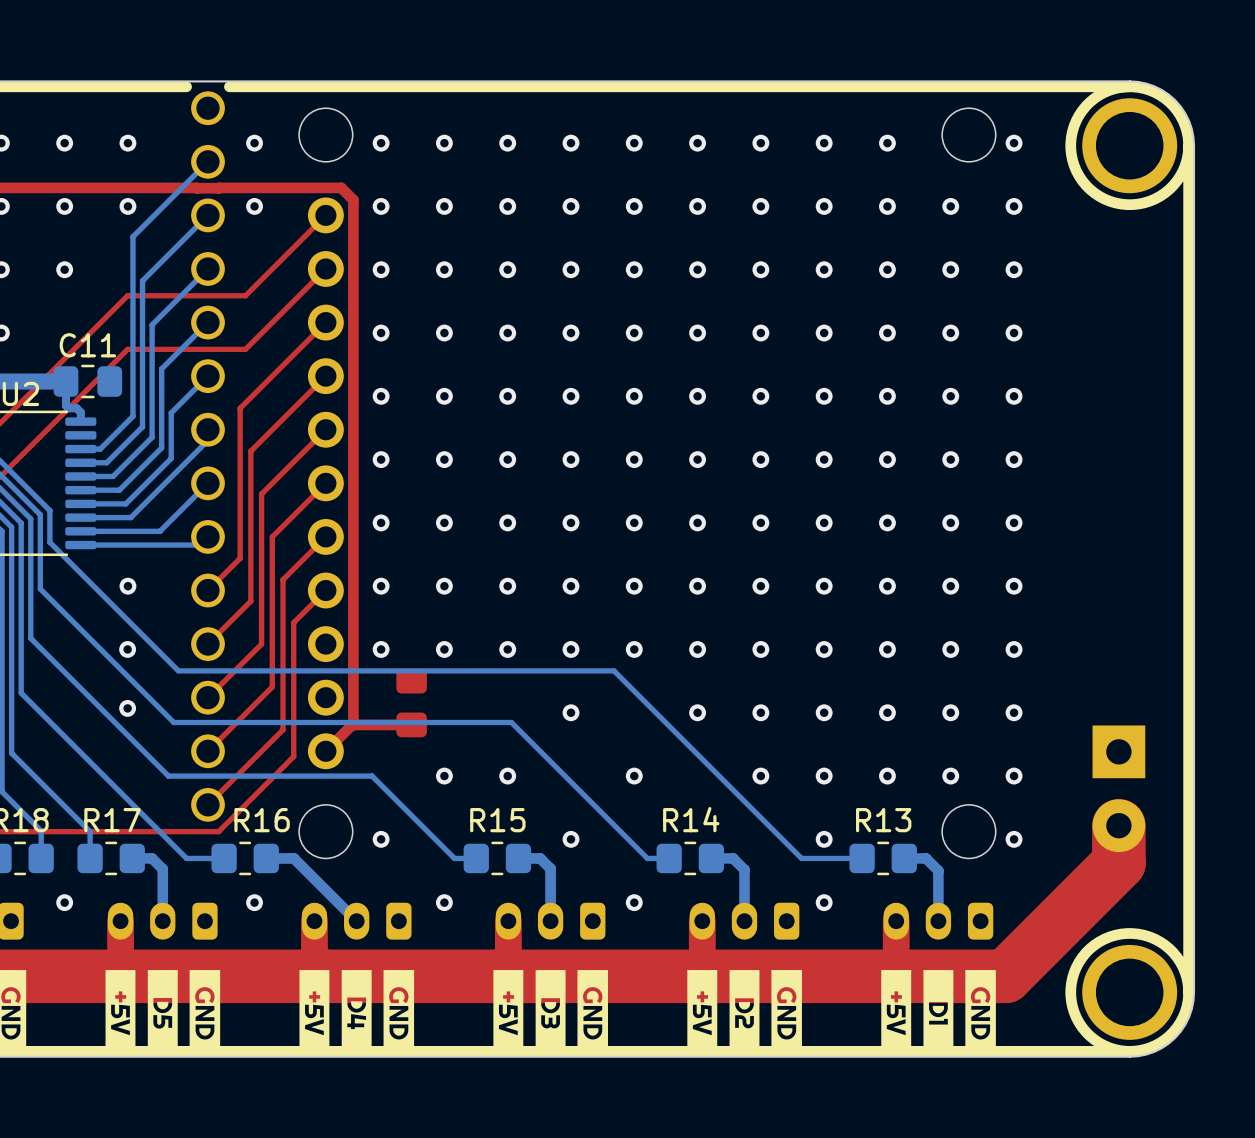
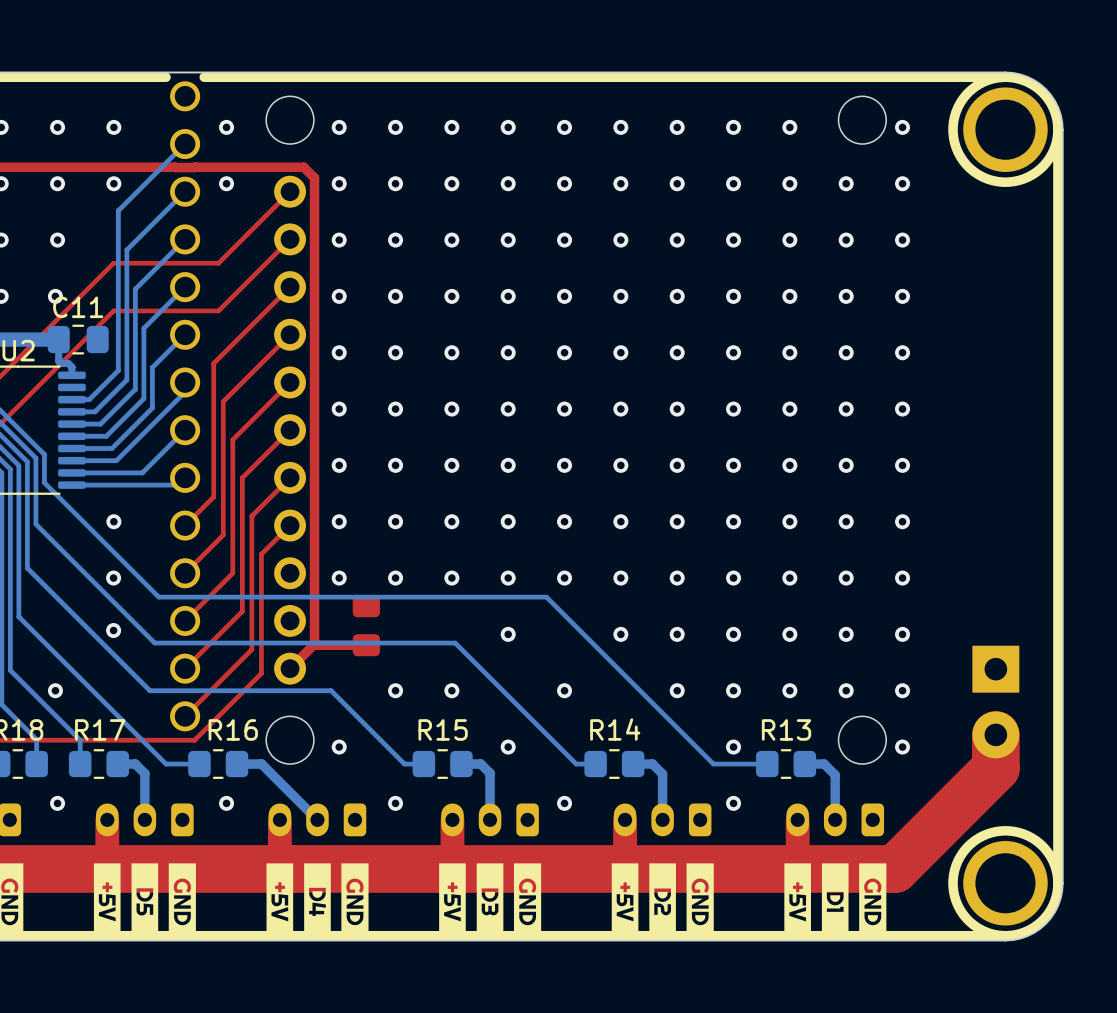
via: none -> (55, 296)
via: none -> (55, 690)

